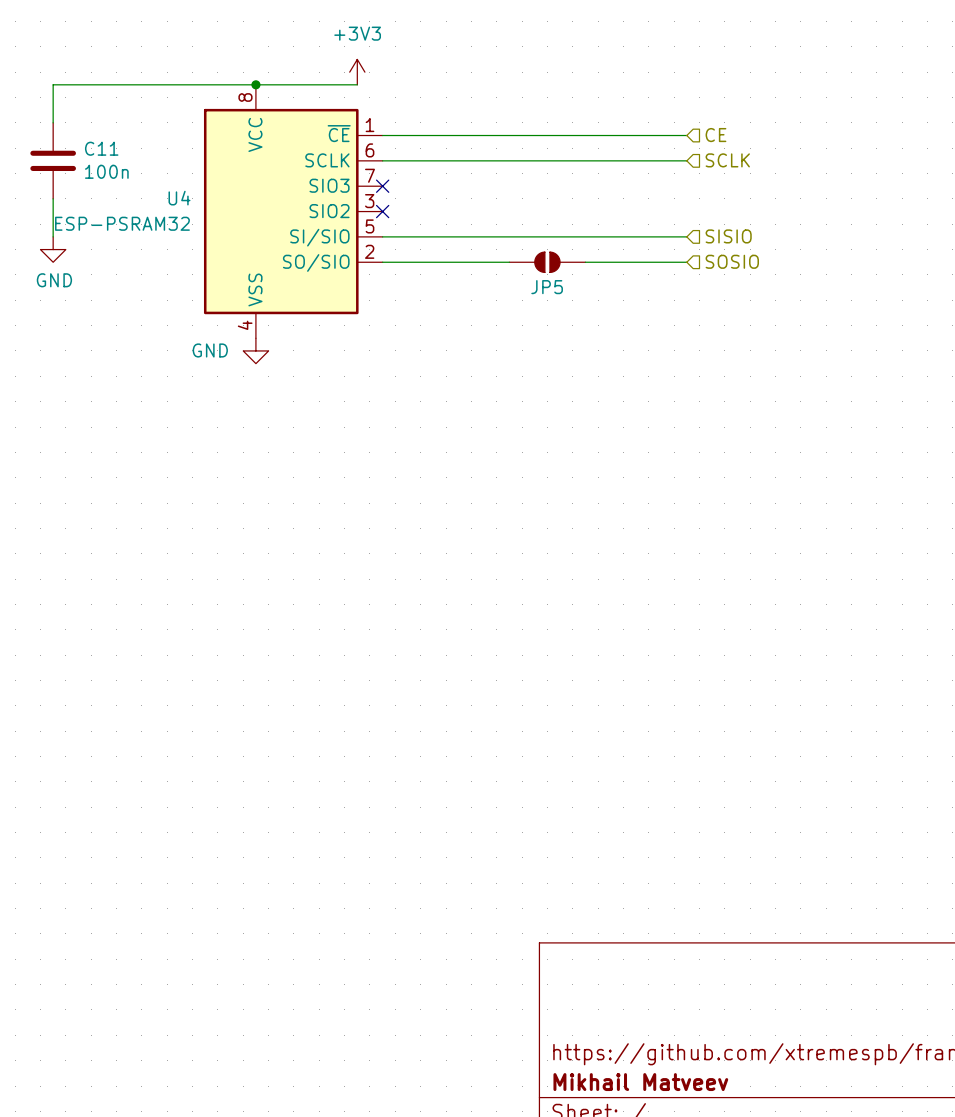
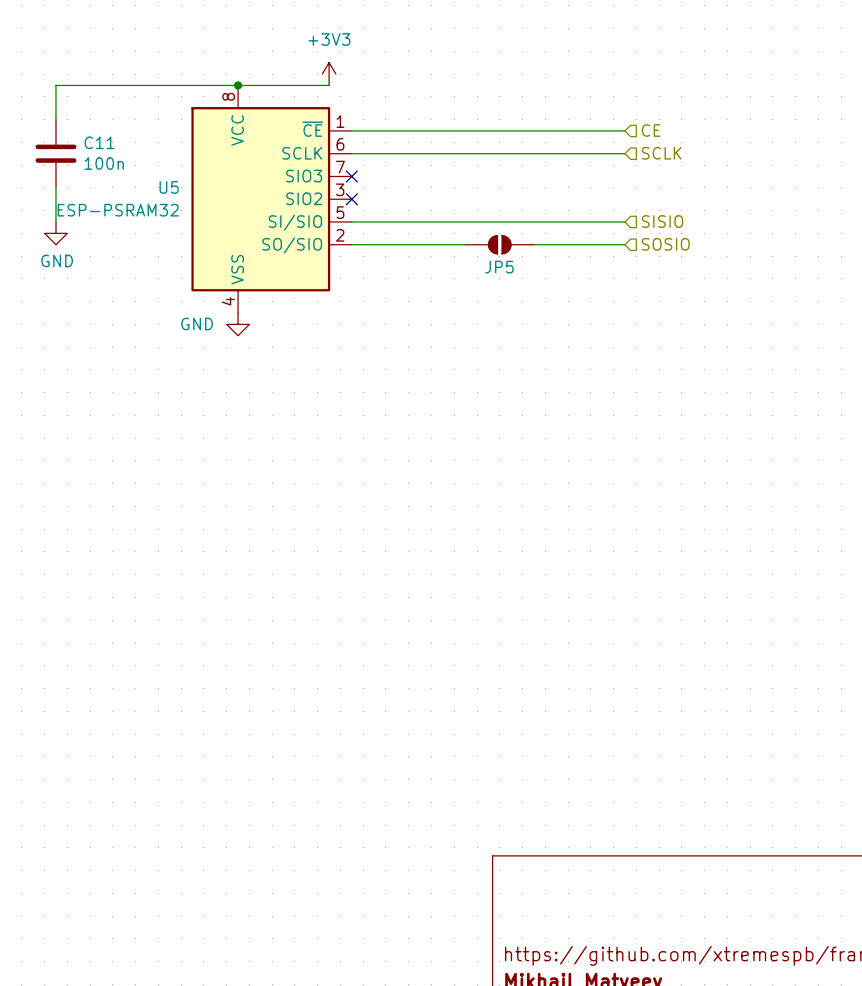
U4 name: U4 (179, 198) -> U5 (169, 187)

